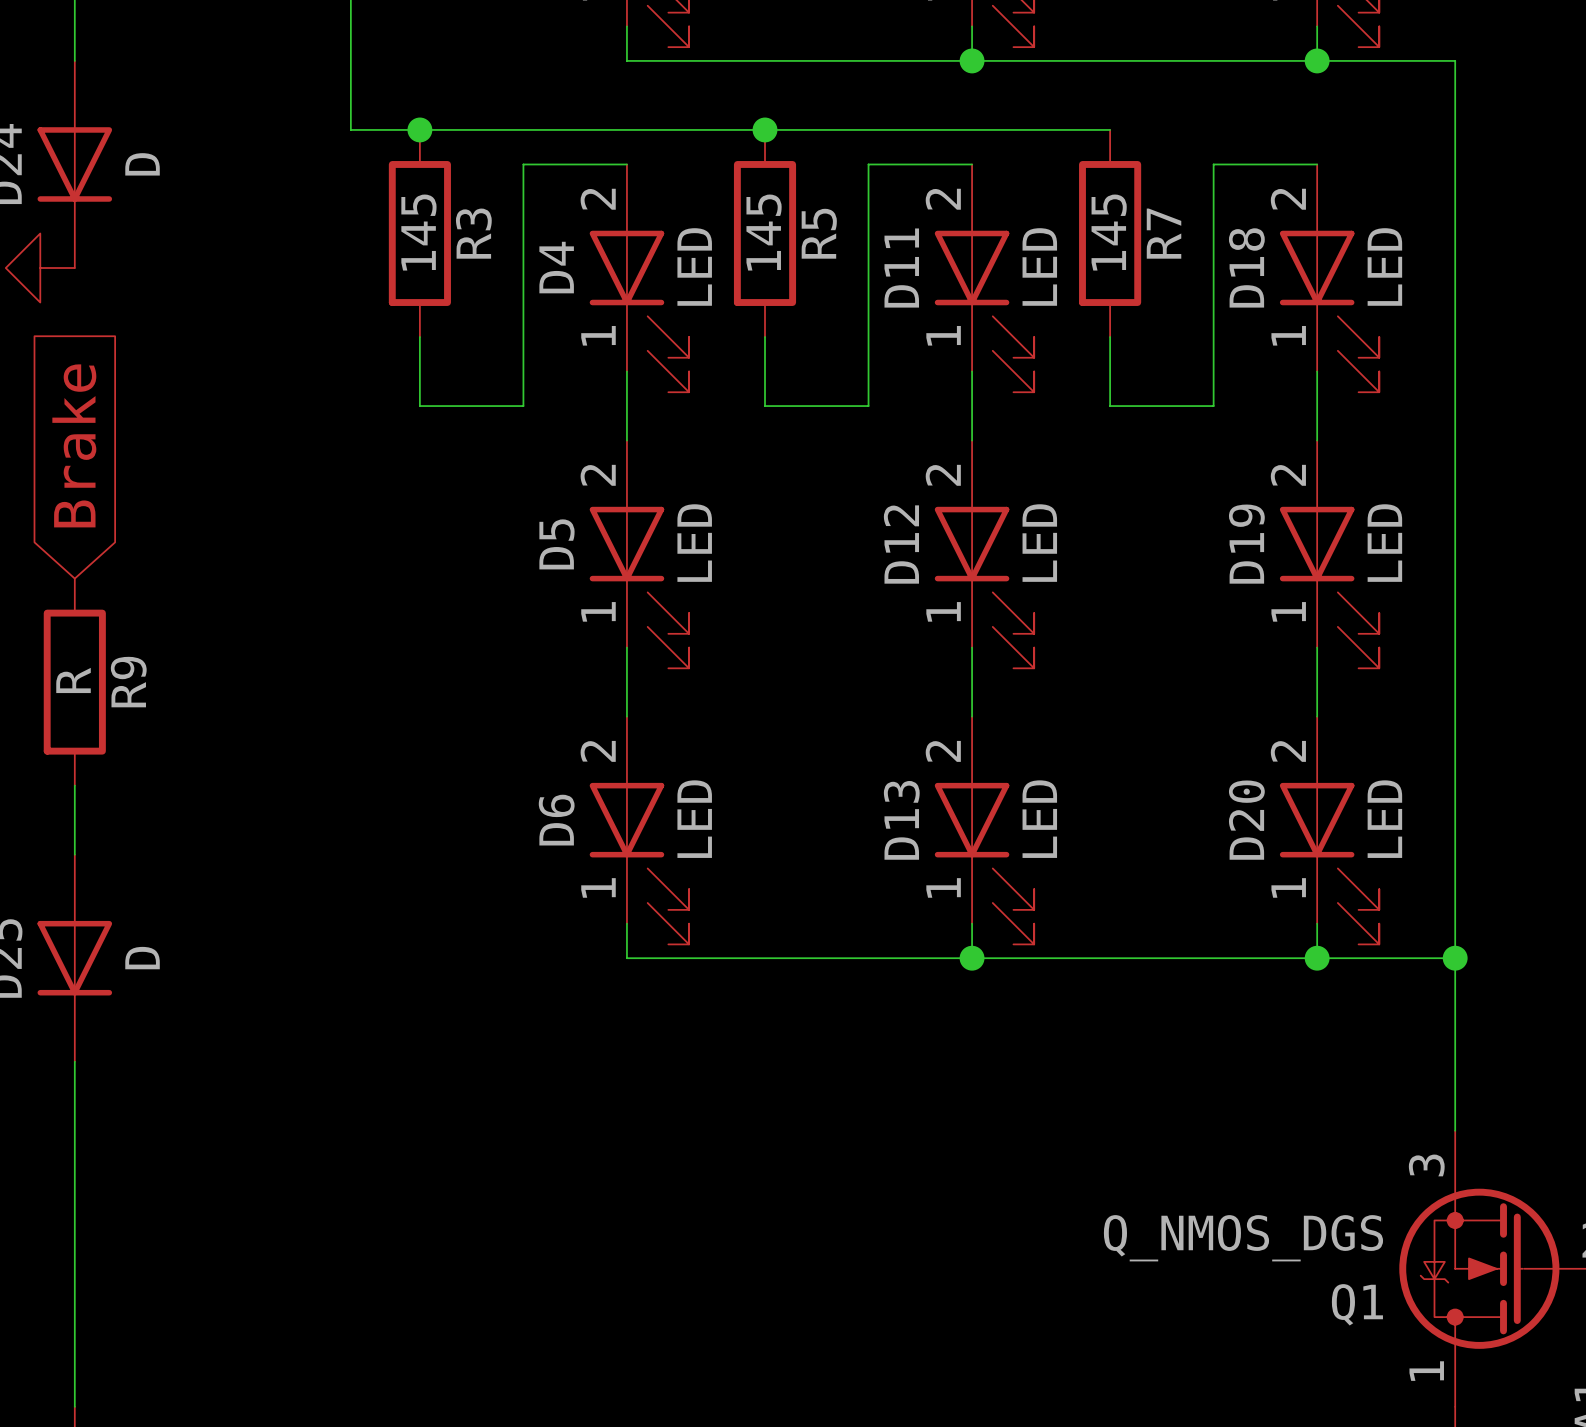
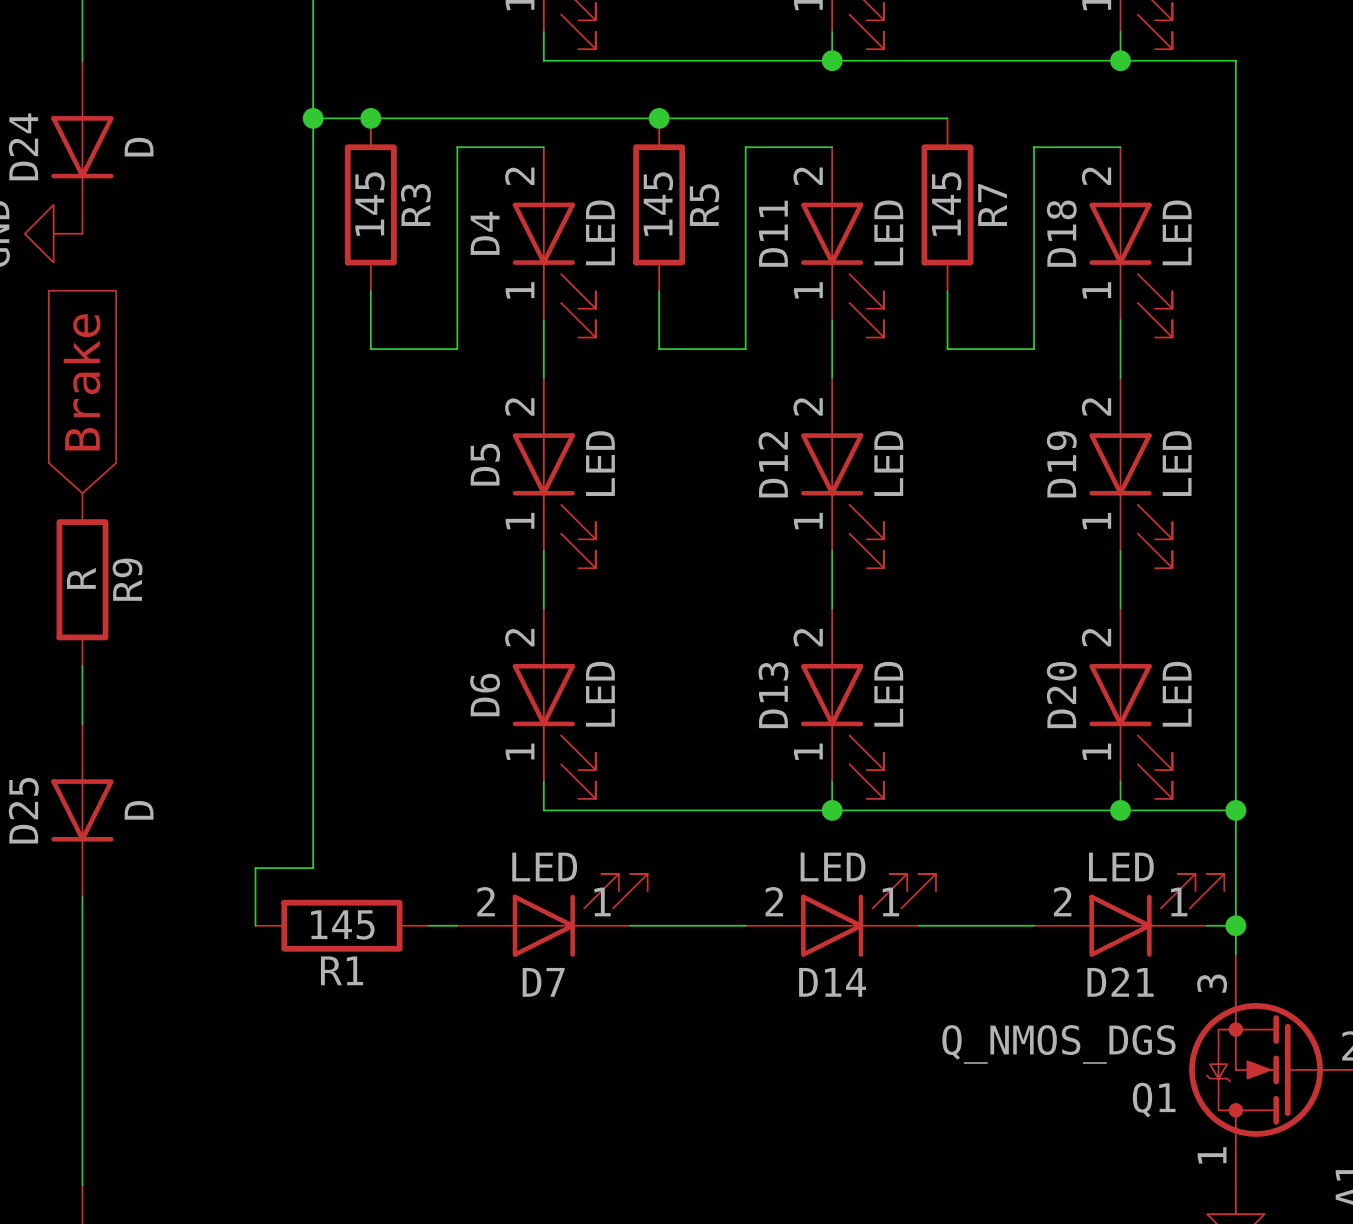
wire: none -> (313, 118) (313, 868) (255, 868) (255, 925)
junction: none -> (313, 118)
D7: none -> LED (552, 915)
D14: none -> LED (840, 915)
D21: none -> LED (1129, 915)
R1: none -> 145 (342, 925)
wire: none -> (428, 925) (457, 925)
wire: none -> (630, 925) (745, 925)
wire: none -> (918, 925) (1034, 925)
wire: none -> (1207, 925) (1235, 925)
junction: none -> (1235, 925)

